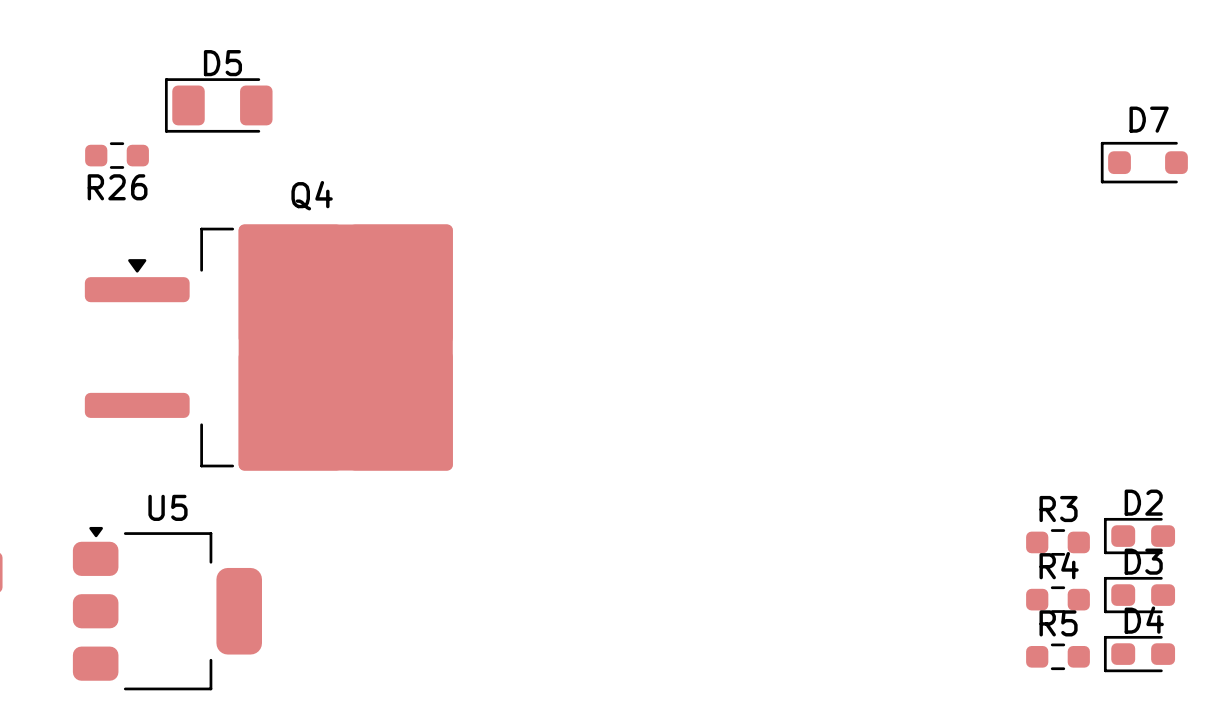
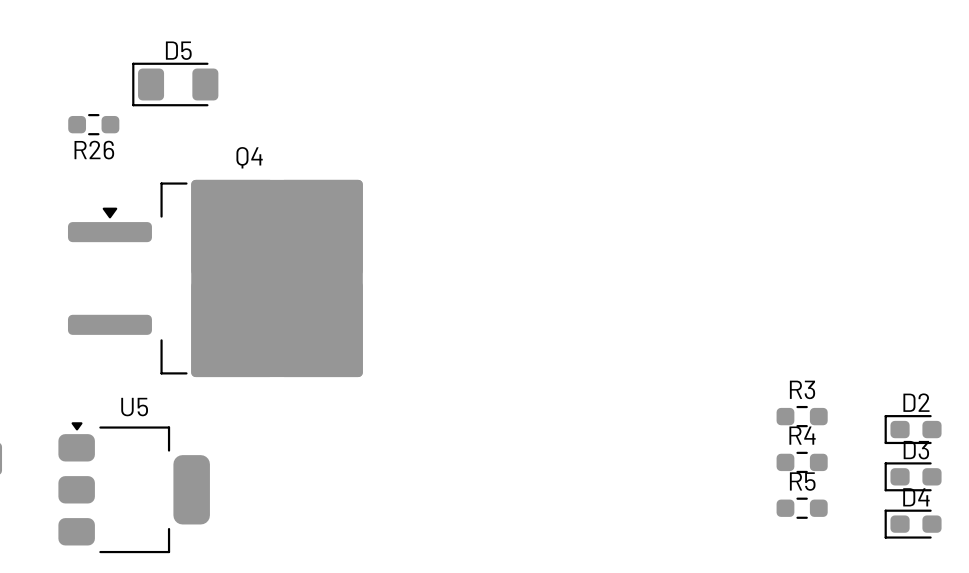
D7: (1144, 162) -> none
R3 position: (1058, 542) -> (802, 416)
R4 position: (1058, 599) -> (802, 462)
R5 position: (1058, 656) -> (802, 508)

